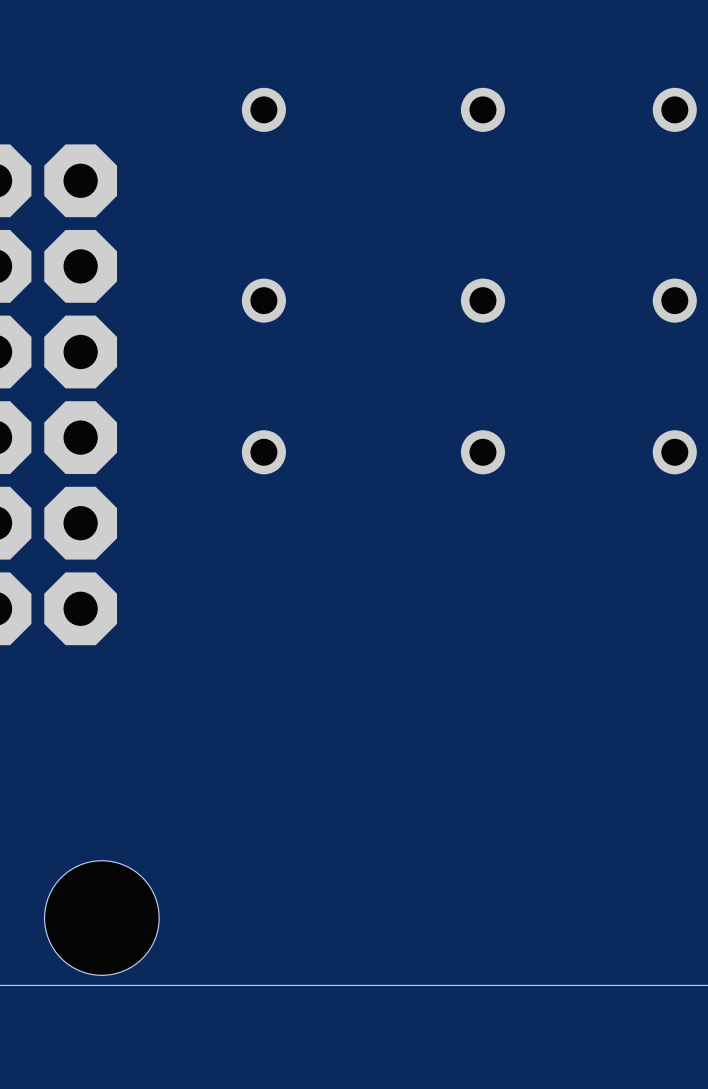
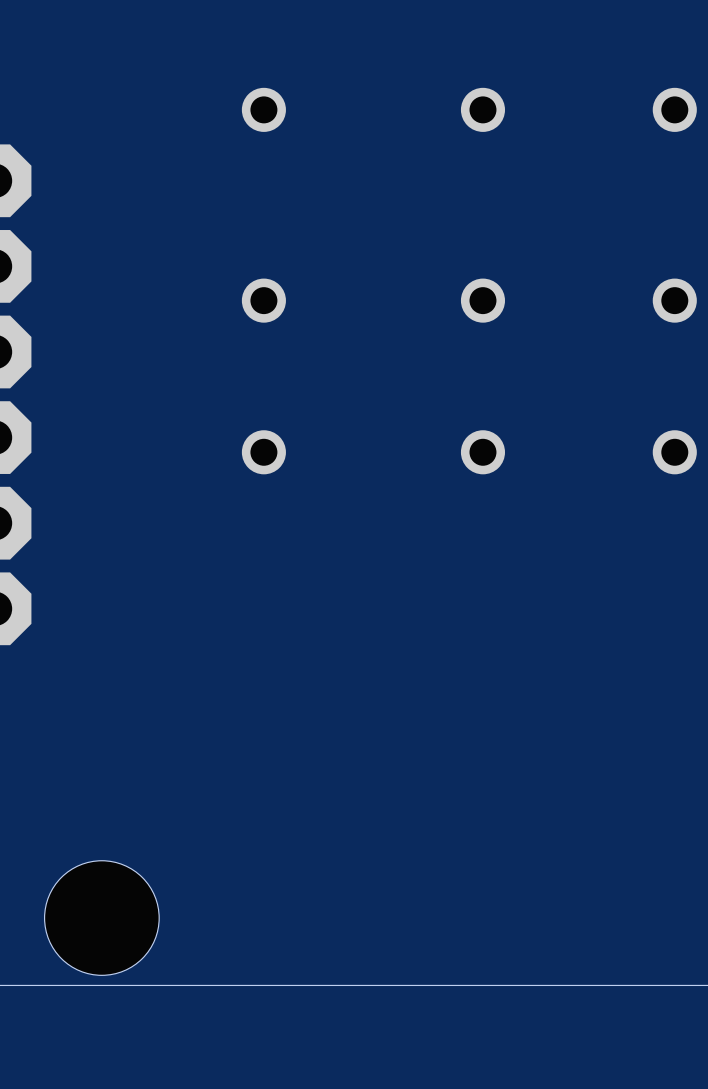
part: (80, 180) -> none
part: (80, 266) -> none
part: (80, 351) -> none
part: (80, 437) -> none
part: (80, 523) -> none
part: (80, 608) -> none

